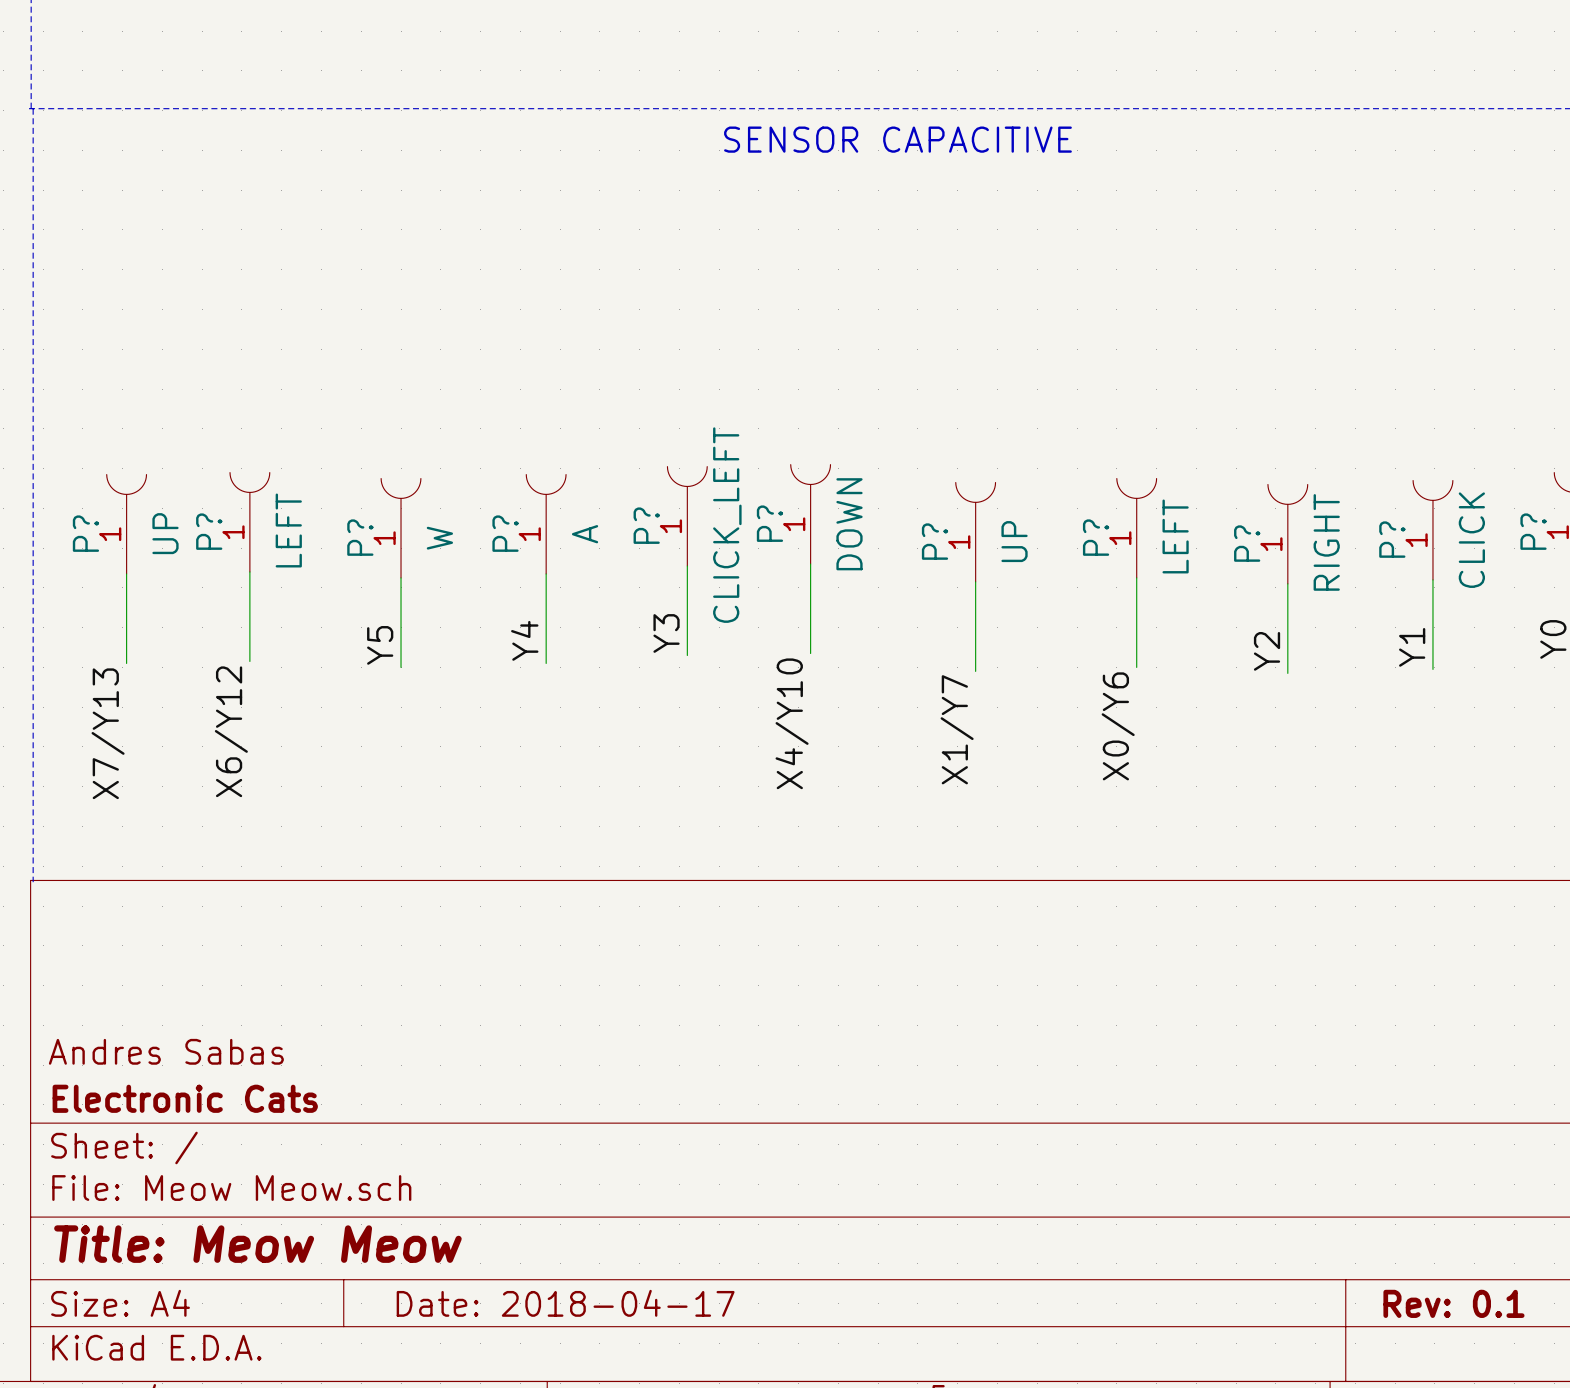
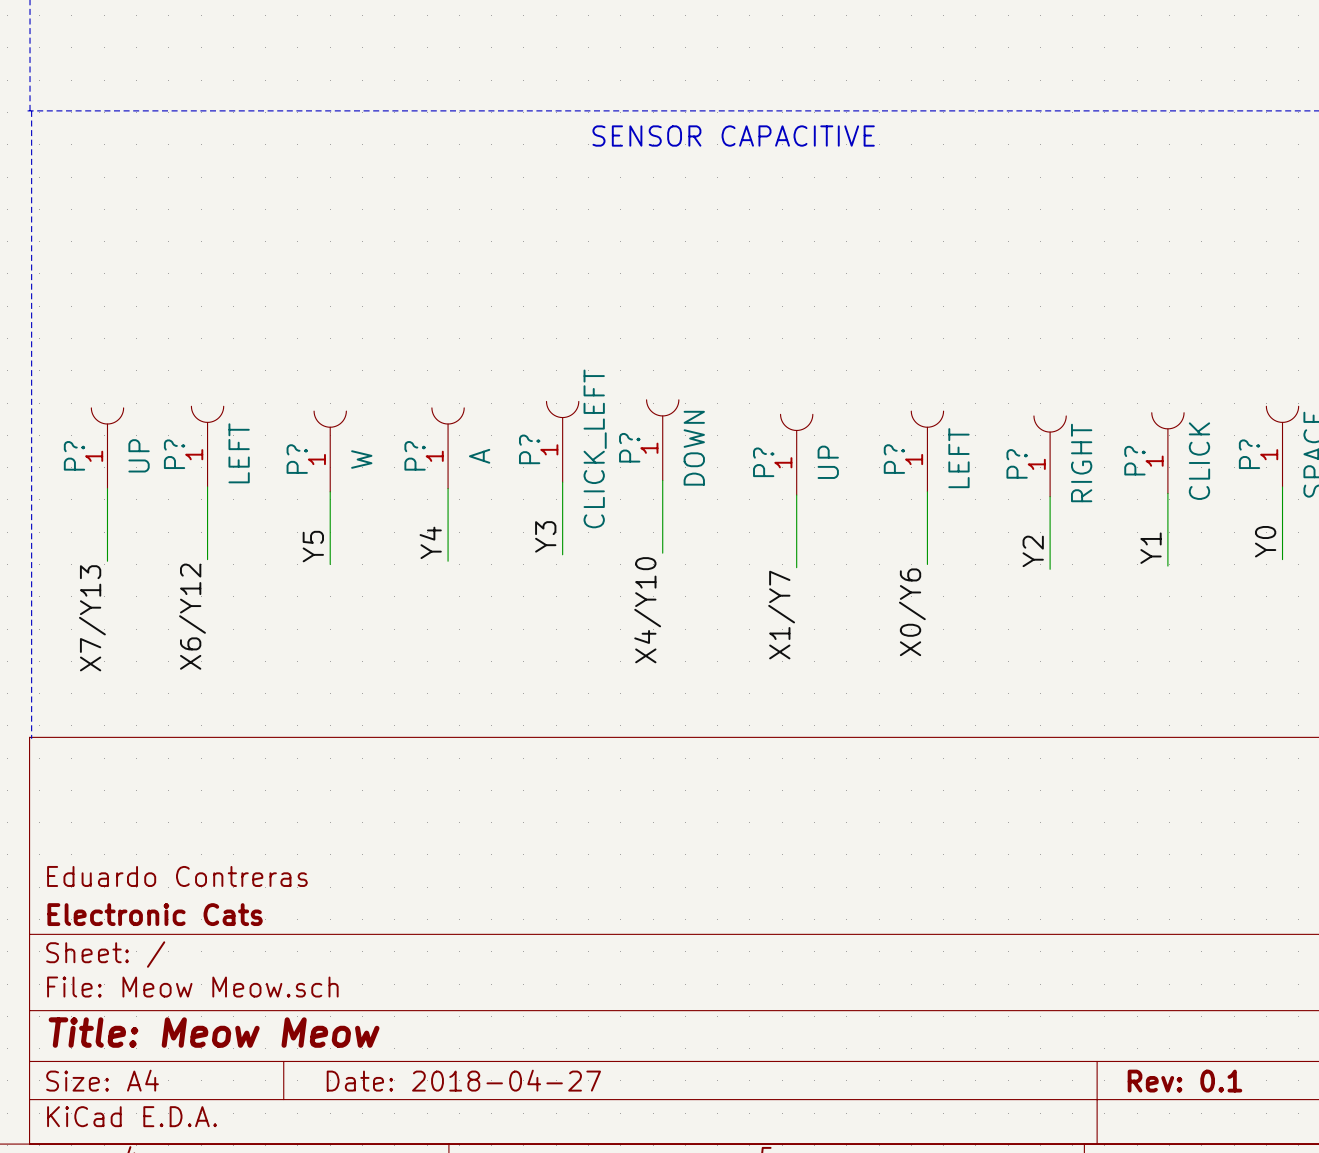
title block: Andres Sabas (166, 1051) -> Eduardo Contreras (177, 876)
title block: Date: 2018-04-17 (565, 1303) -> Date: 2018-04-27 (463, 1080)

